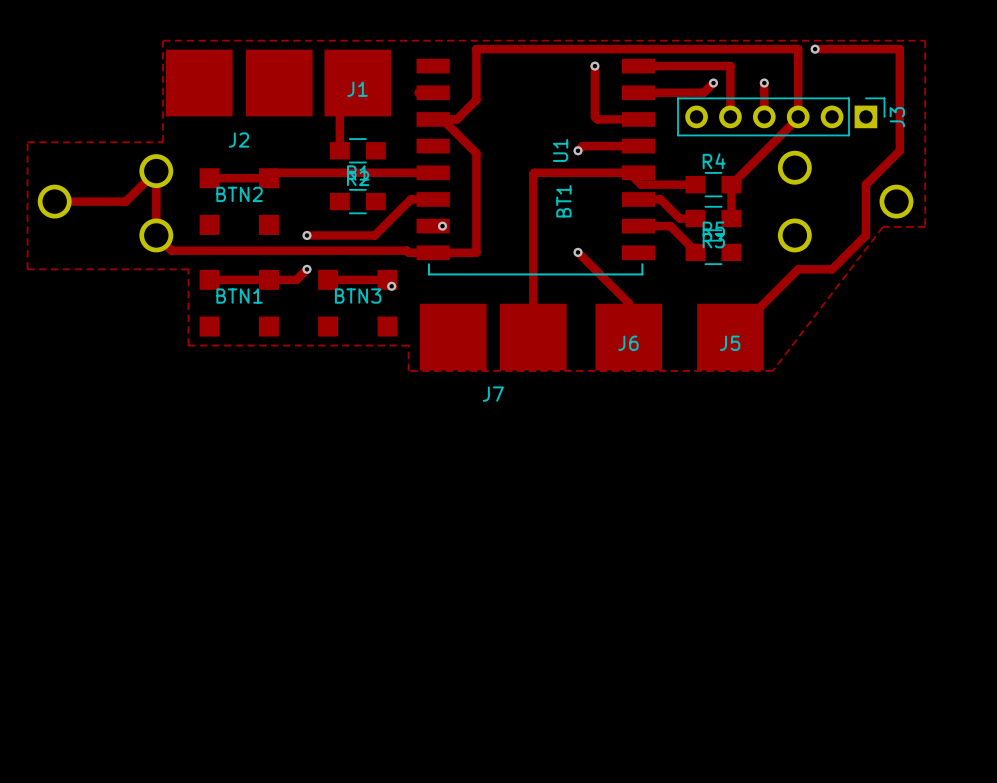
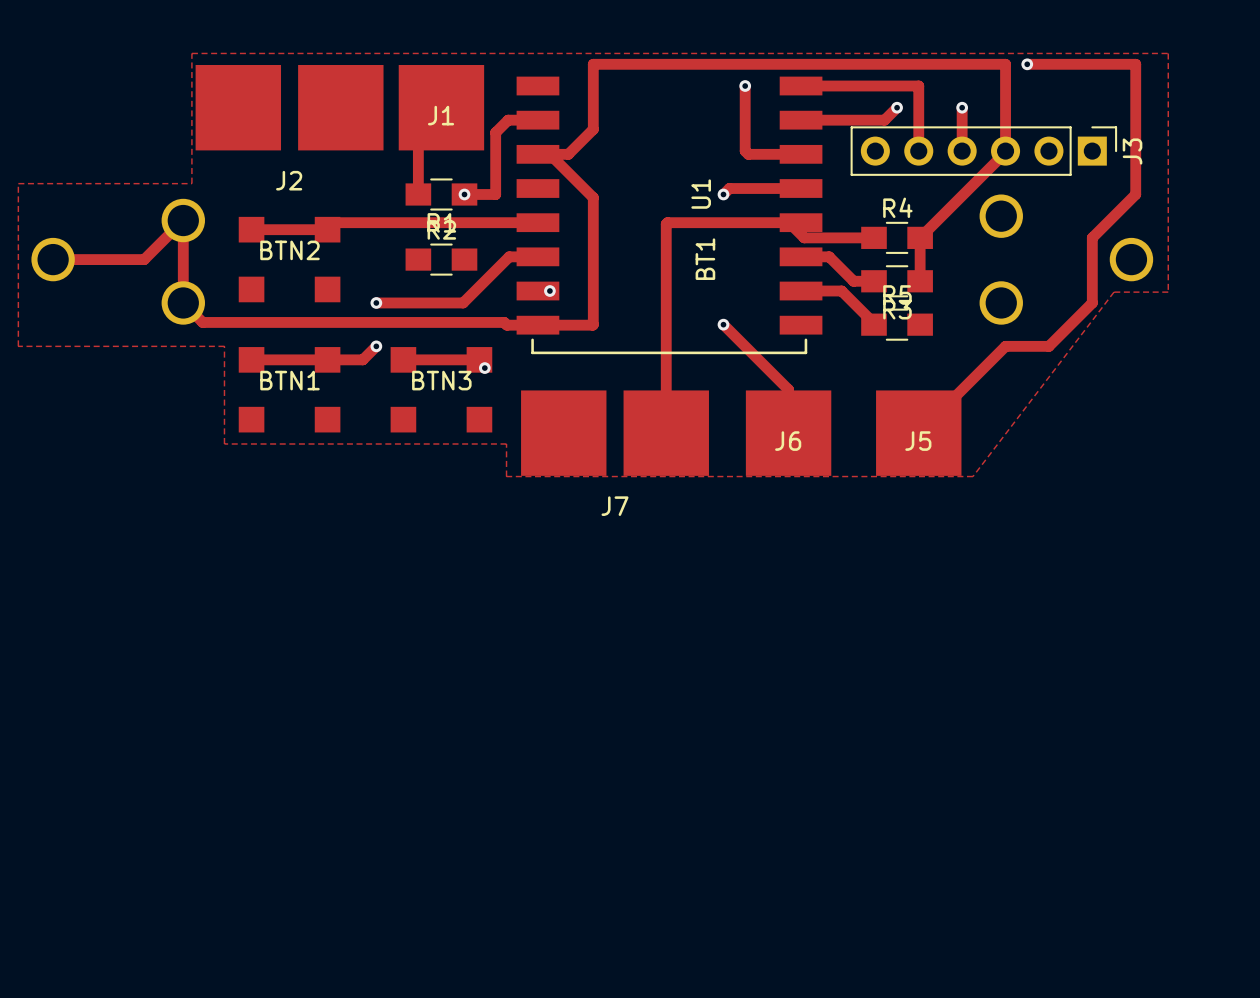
track: none -> (519, 120) (508, 120) (495, 132) (495, 194) (464, 194)
via: none -> (464, 194)

